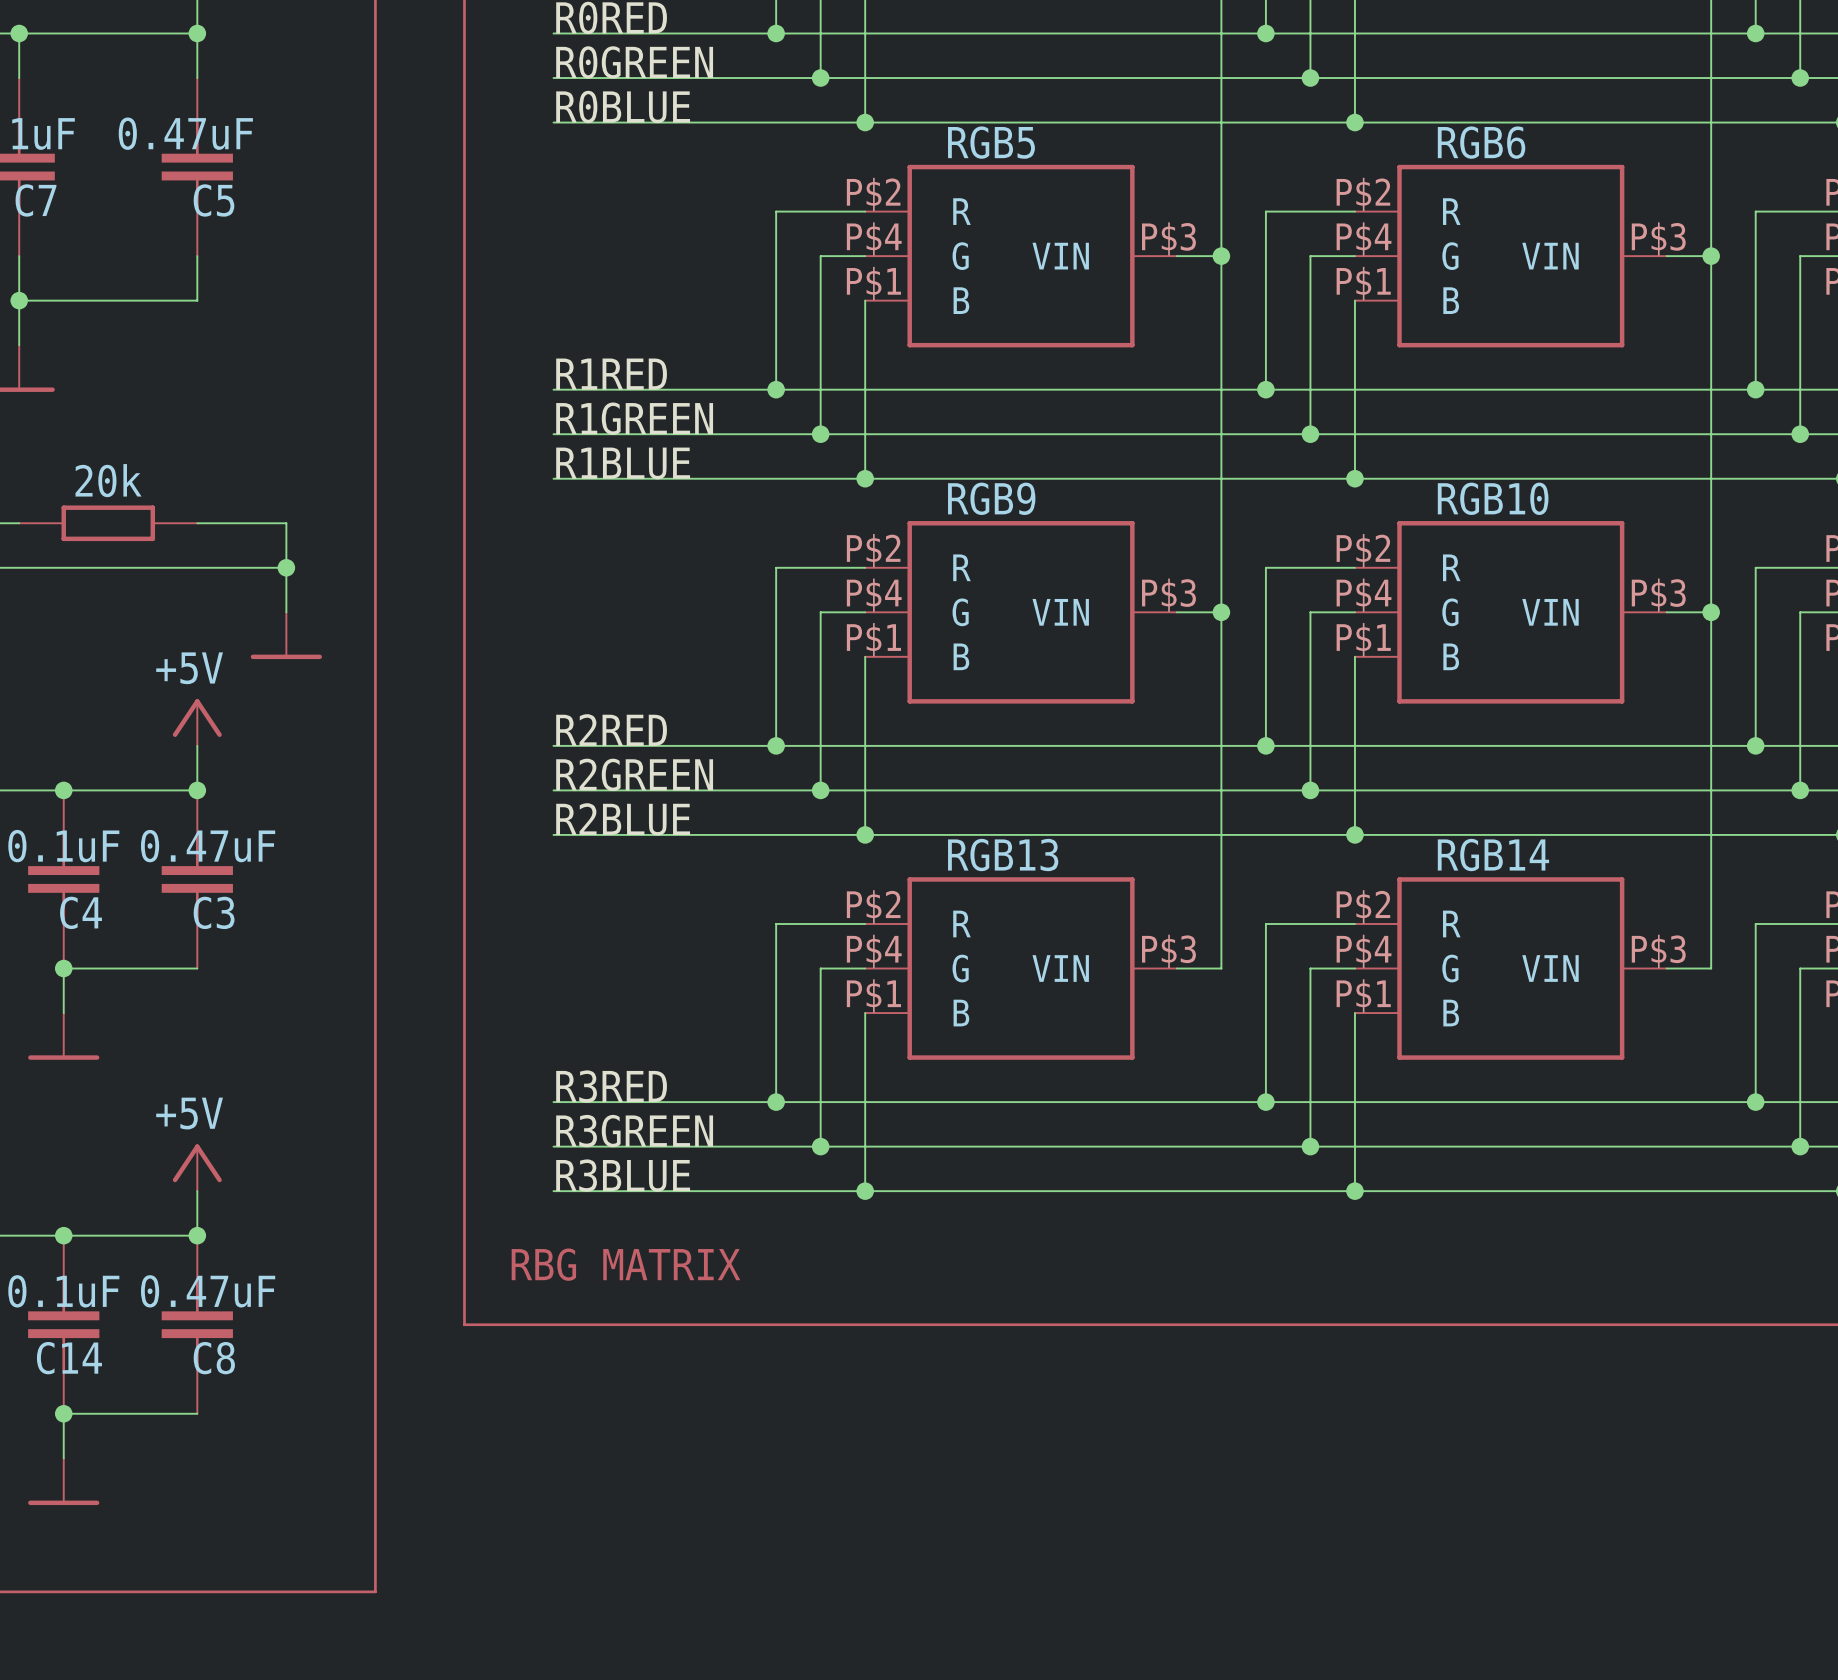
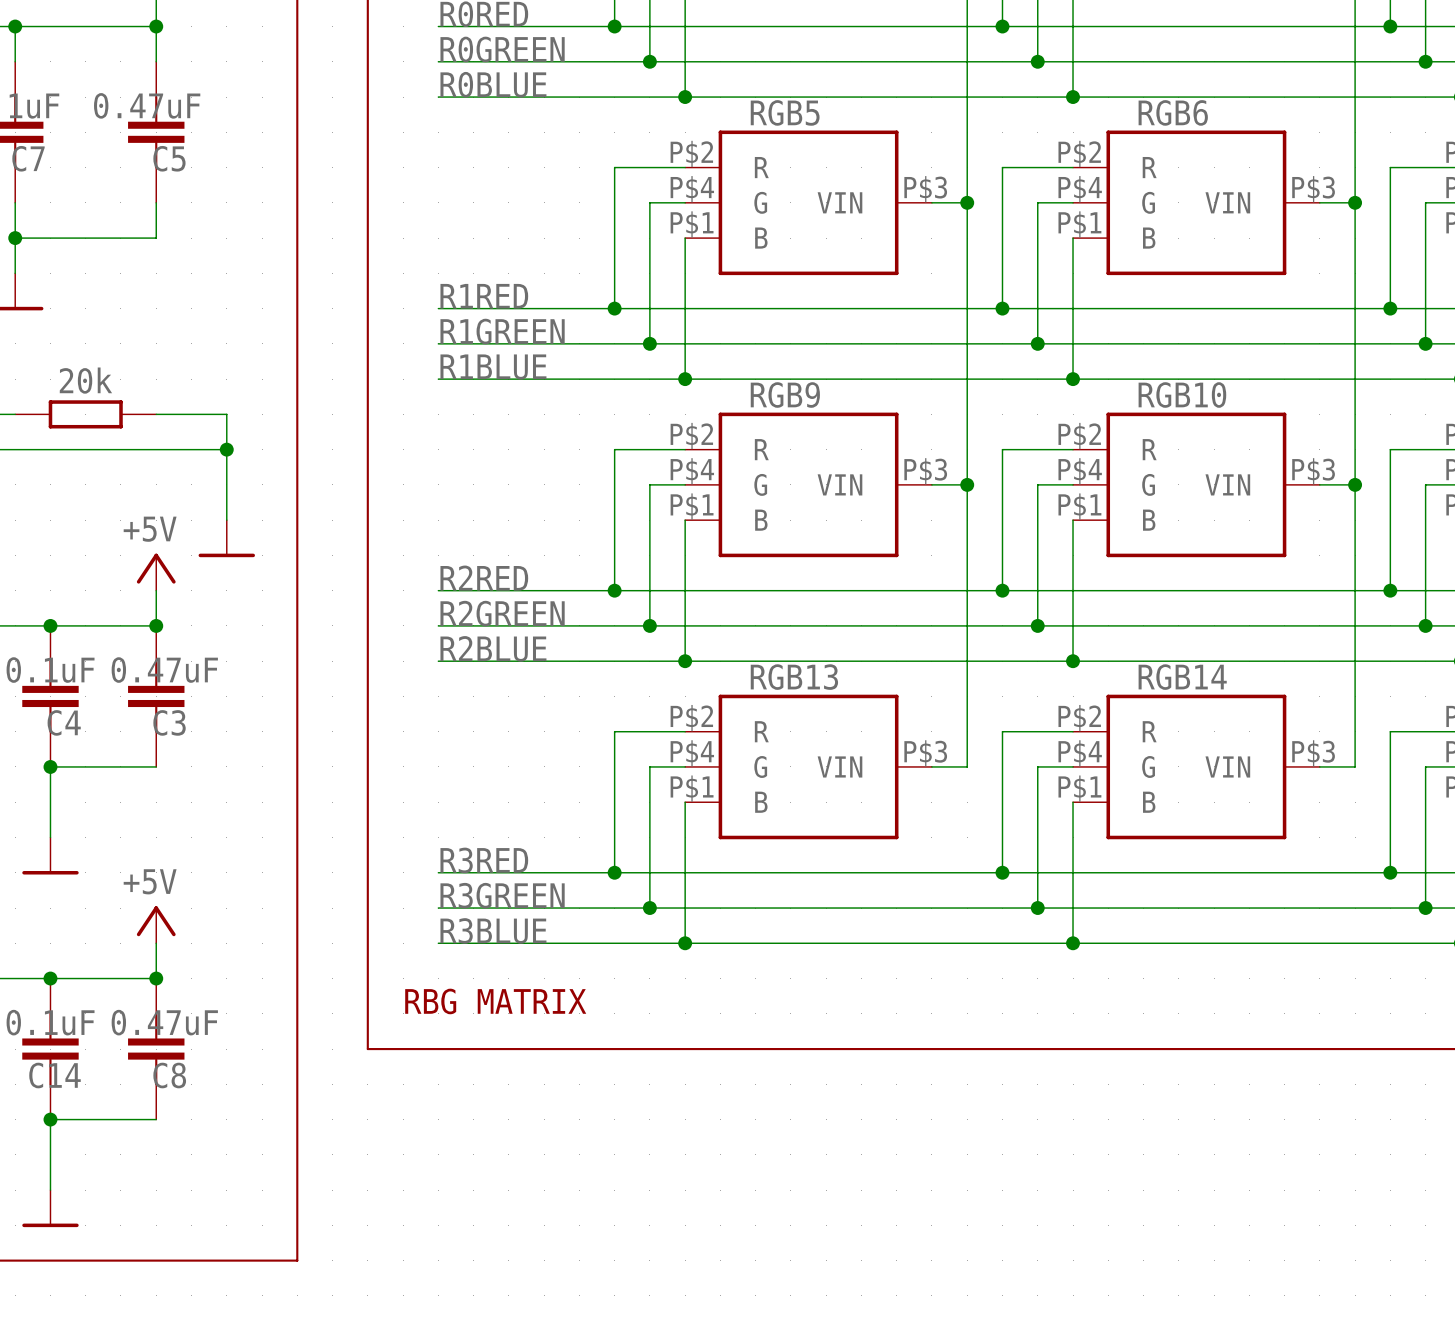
power symbol position: (286, 635) -> (226, 538)
power symbol position: (63, 1036) -> (50, 856)
power symbol position: (63, 1481) -> (50, 1208)

